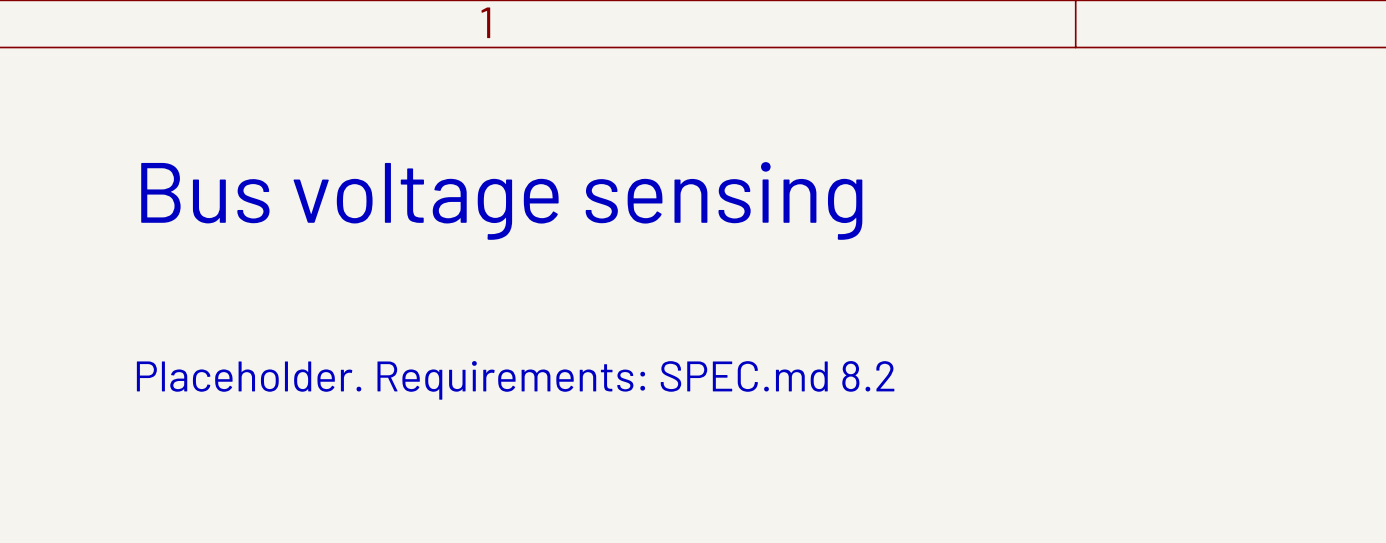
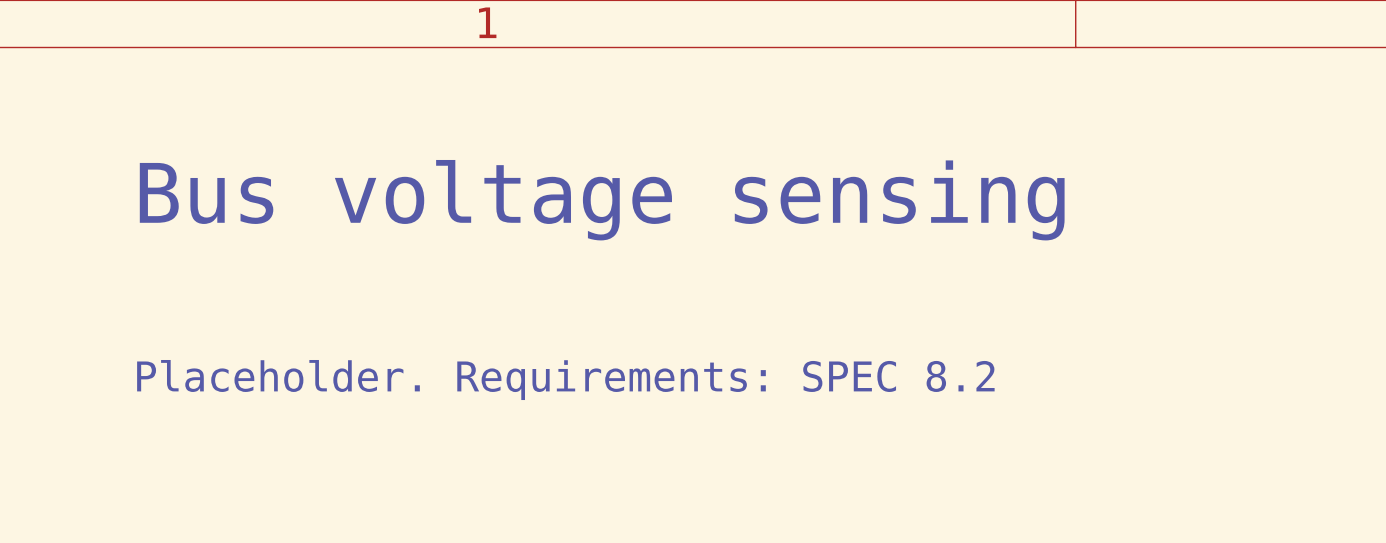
text: Placeholder. Requirements: SPEC.md 8.2 (515, 380) -> Placeholder. Requirements: SPEC 8.2 (565, 380)

